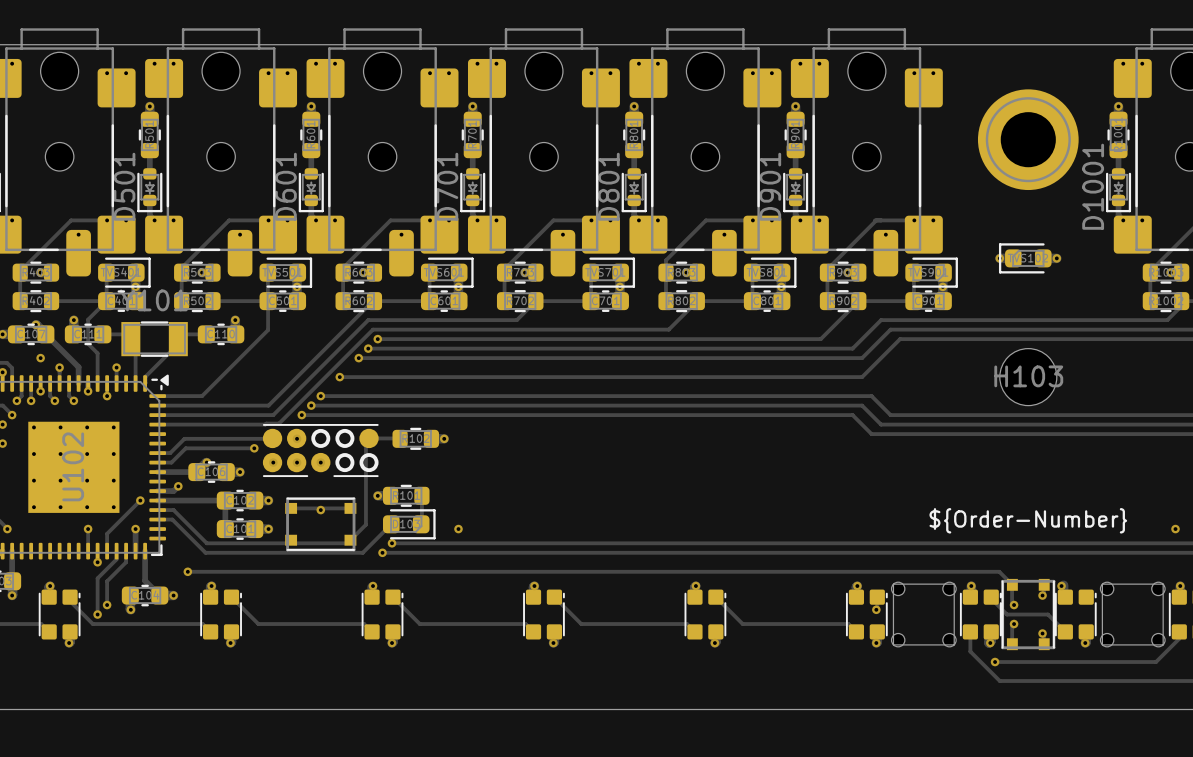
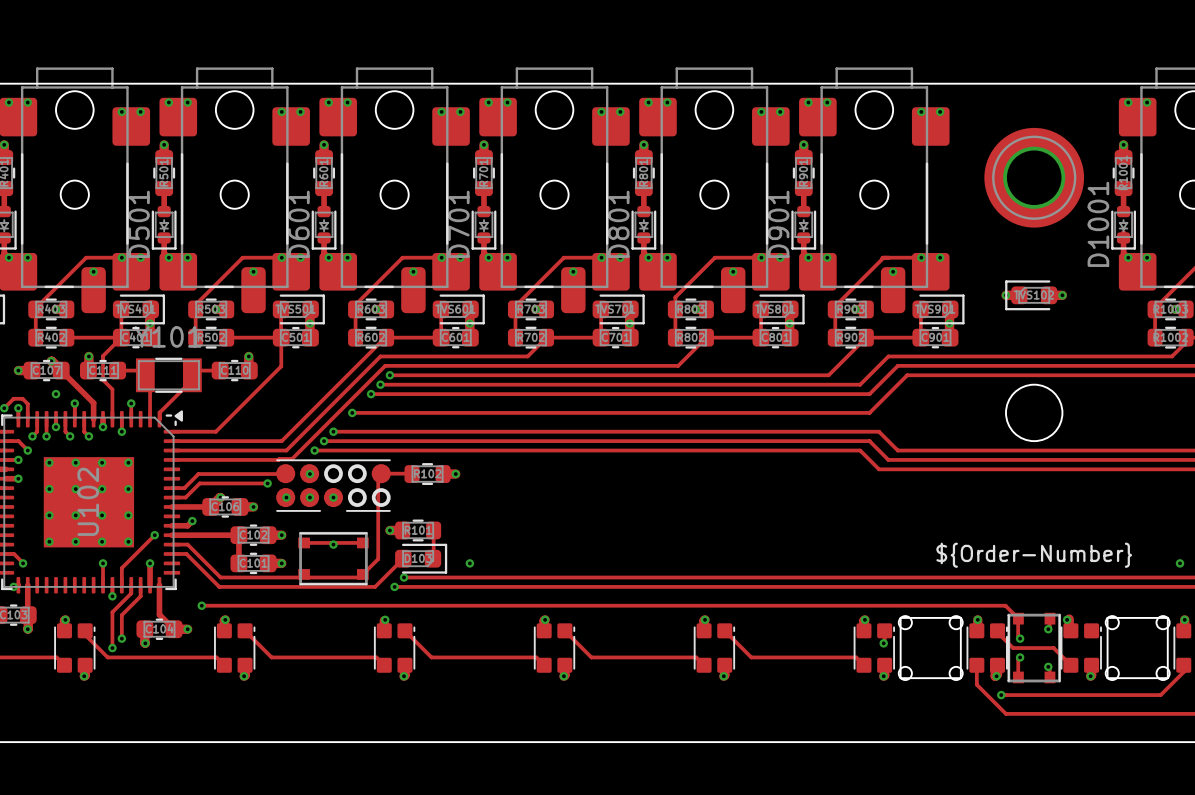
H103 name: H103 (1028, 376) -> none

